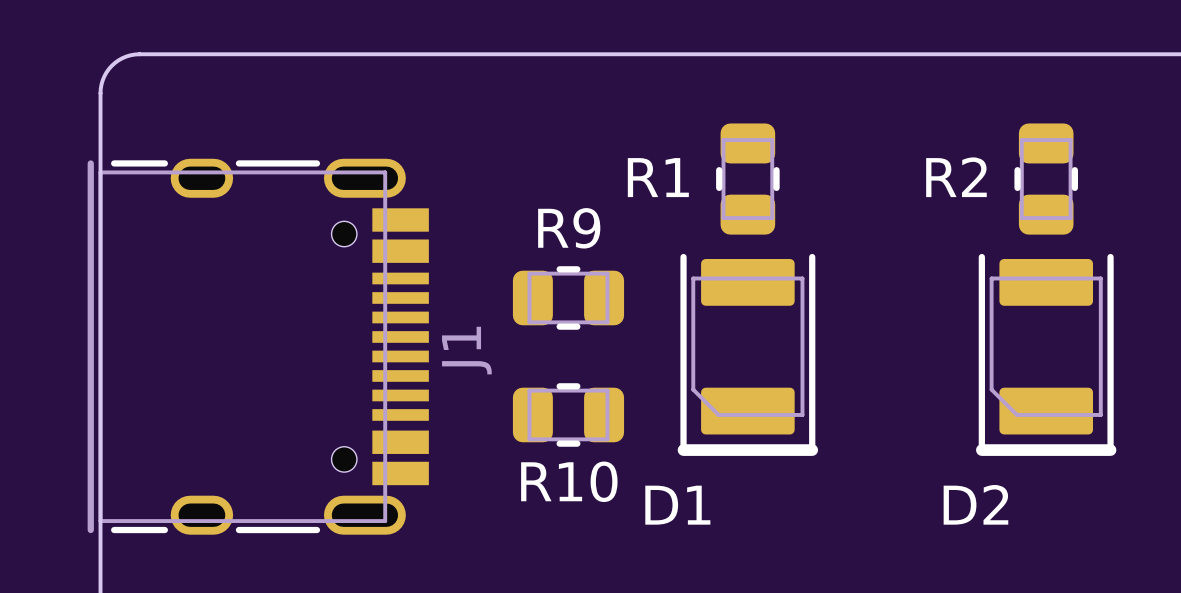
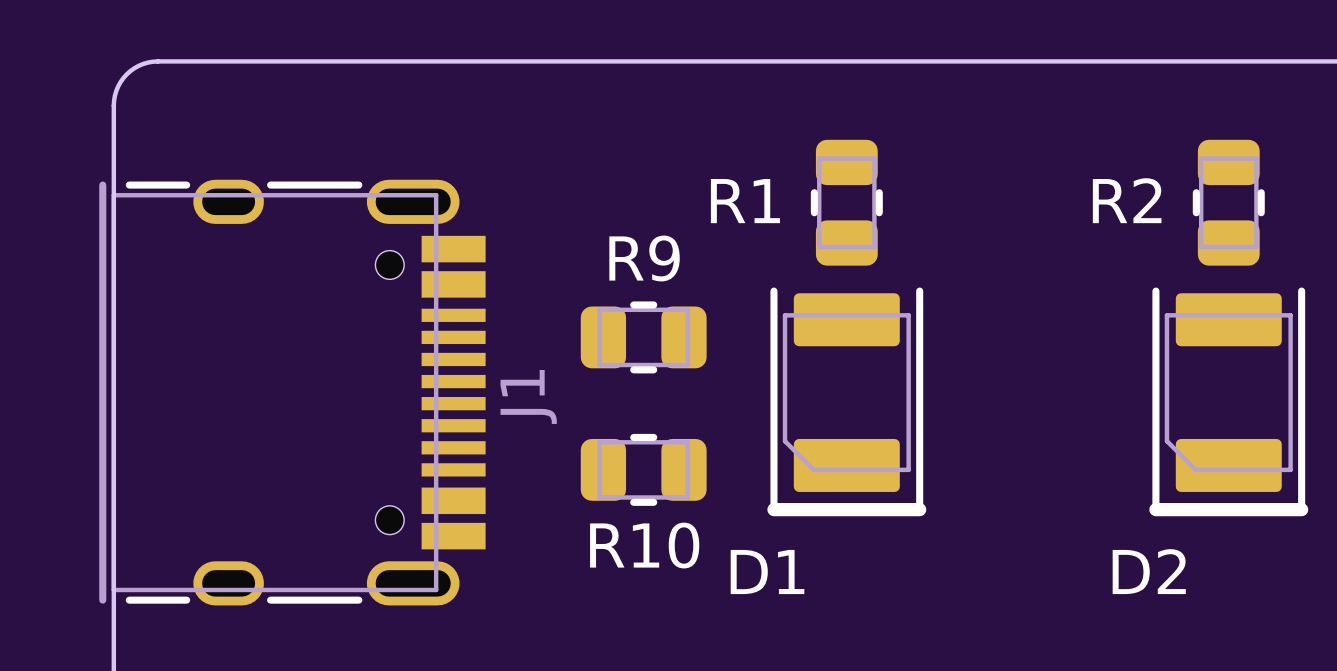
R2 position: (1046, 179) -> (1228, 202)
D2 position: (1046, 354) -> (1228, 401)

